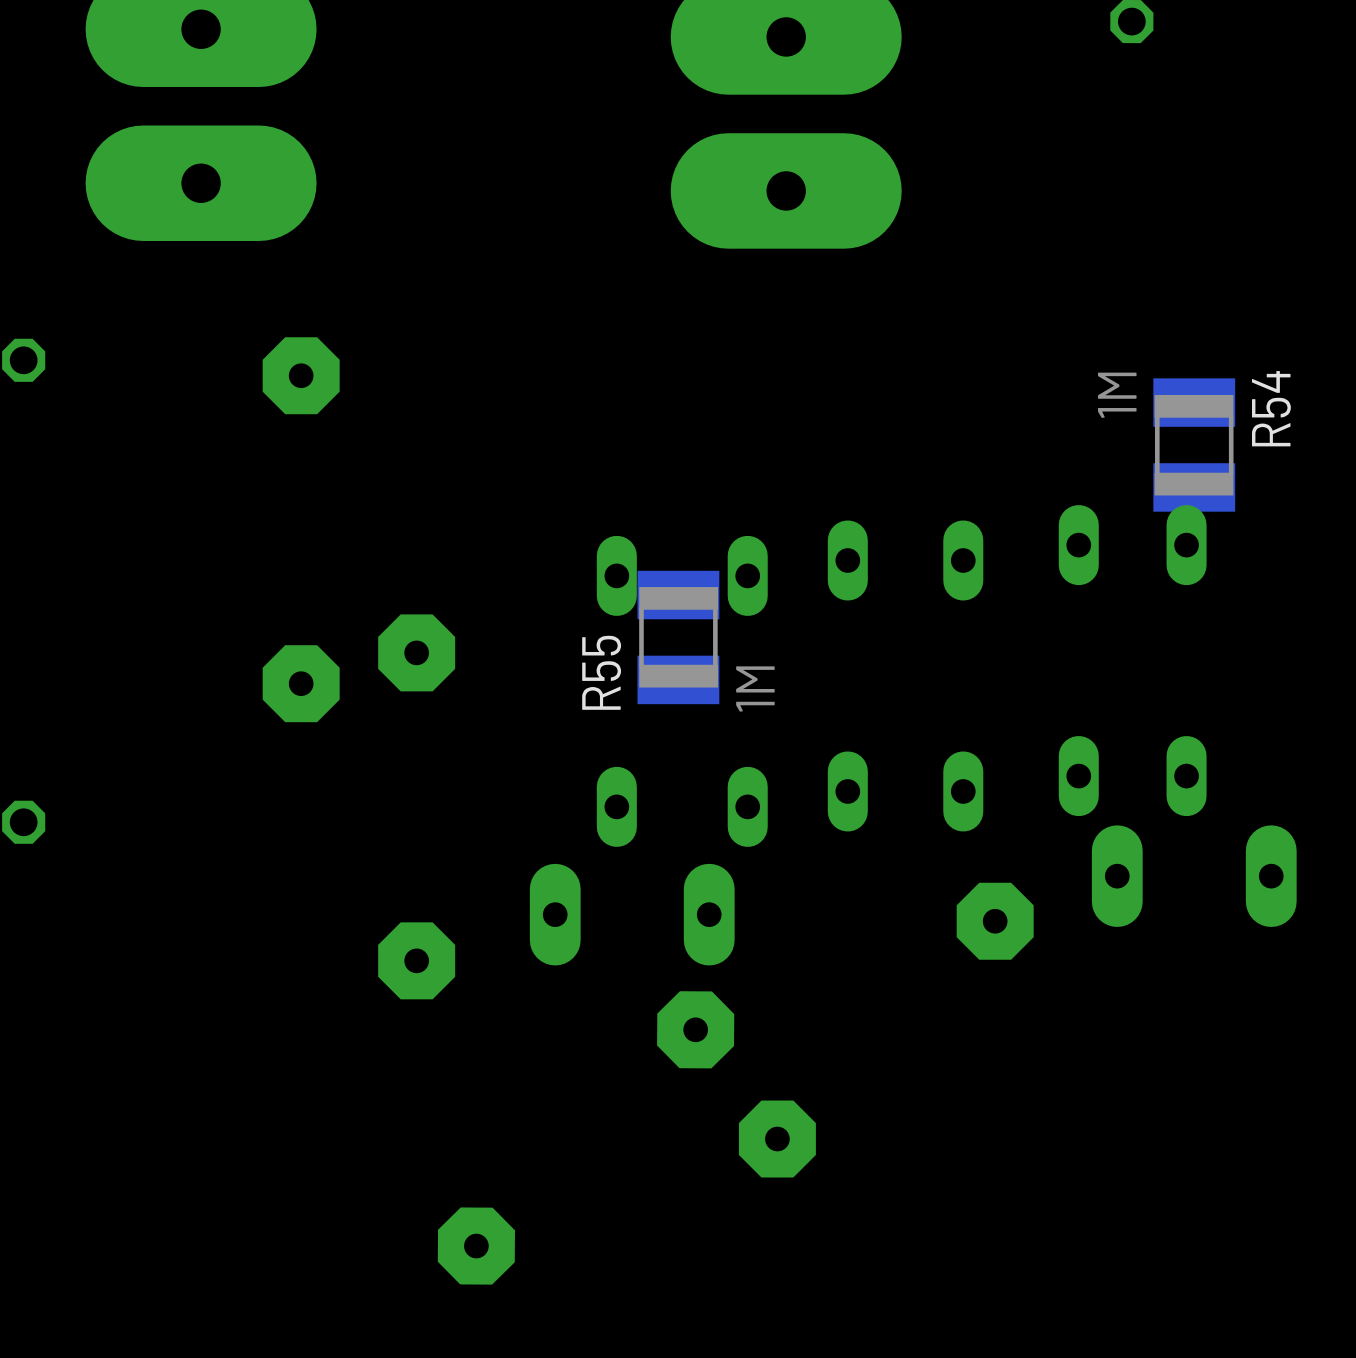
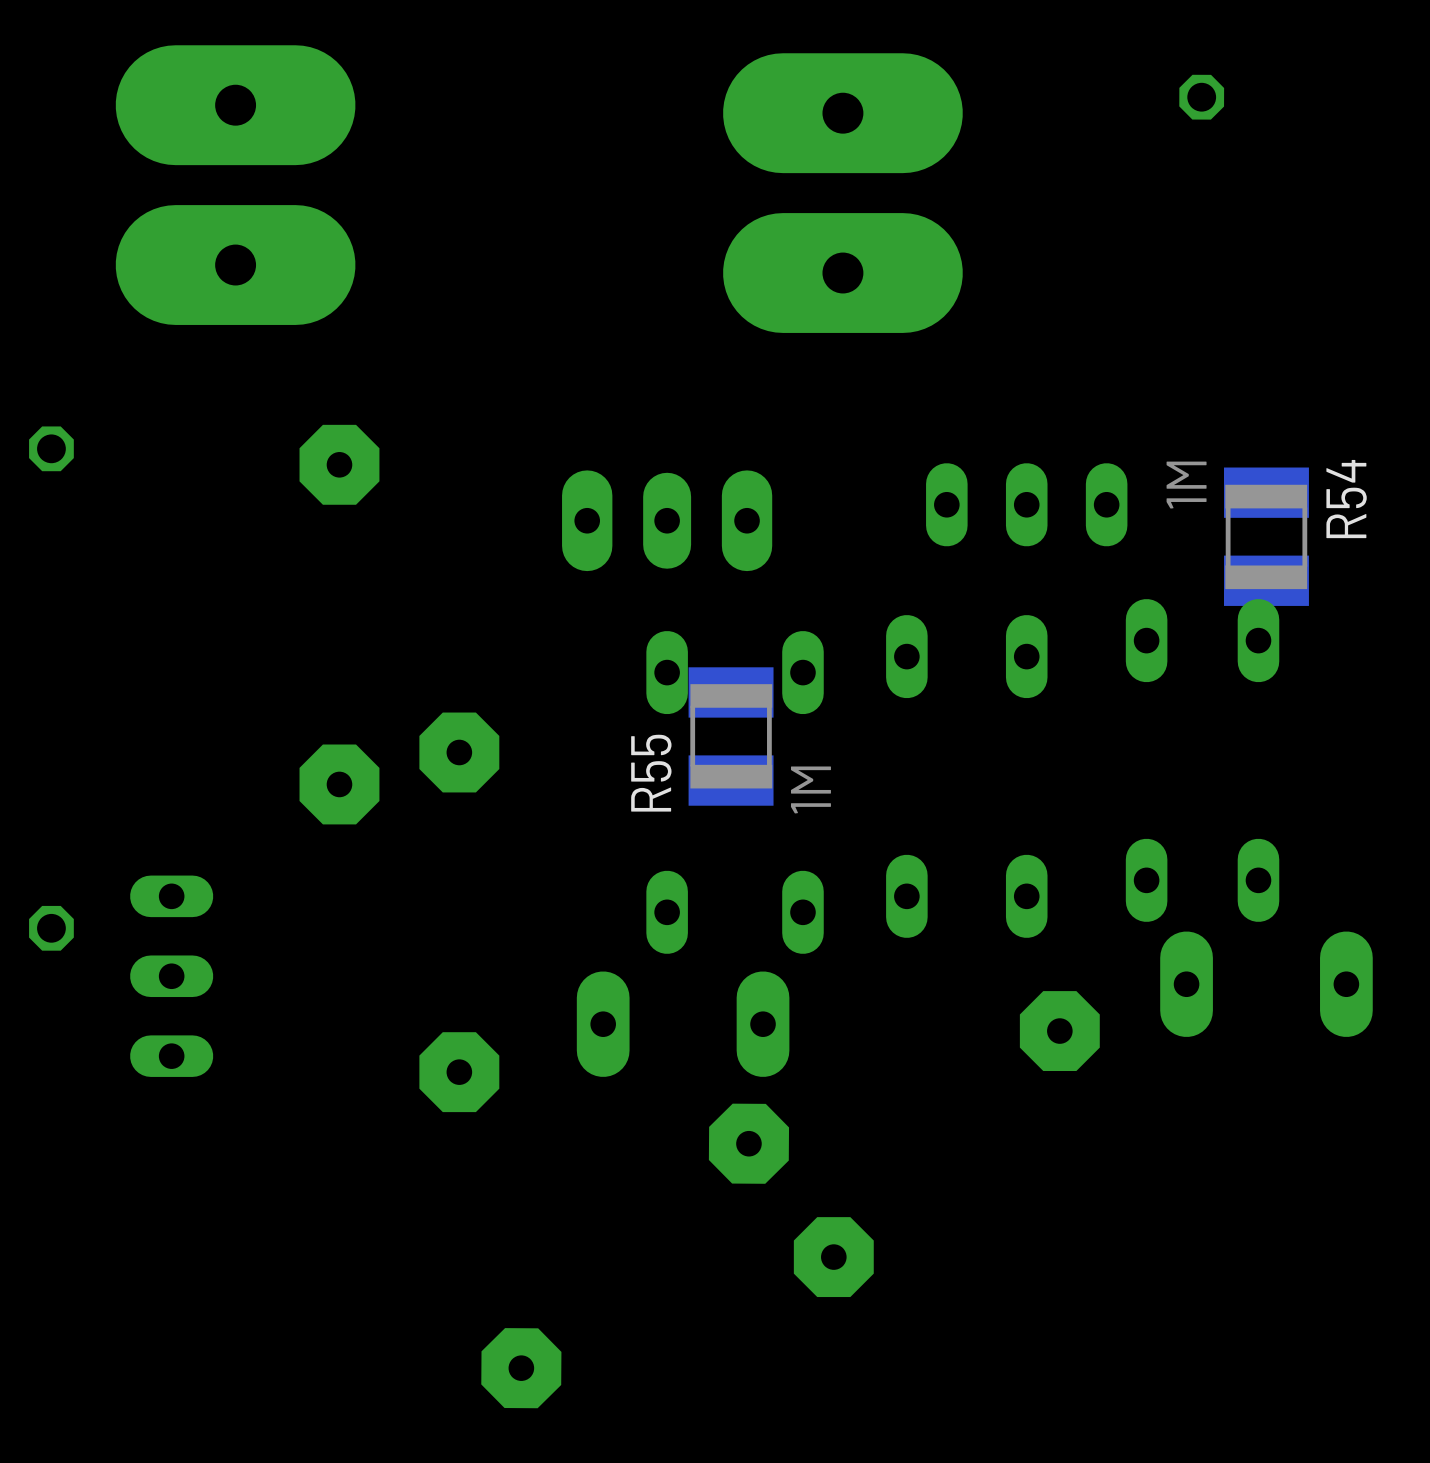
part: none -> (1026, 504)
part: none -> (667, 520)
part: none -> (171, 976)

